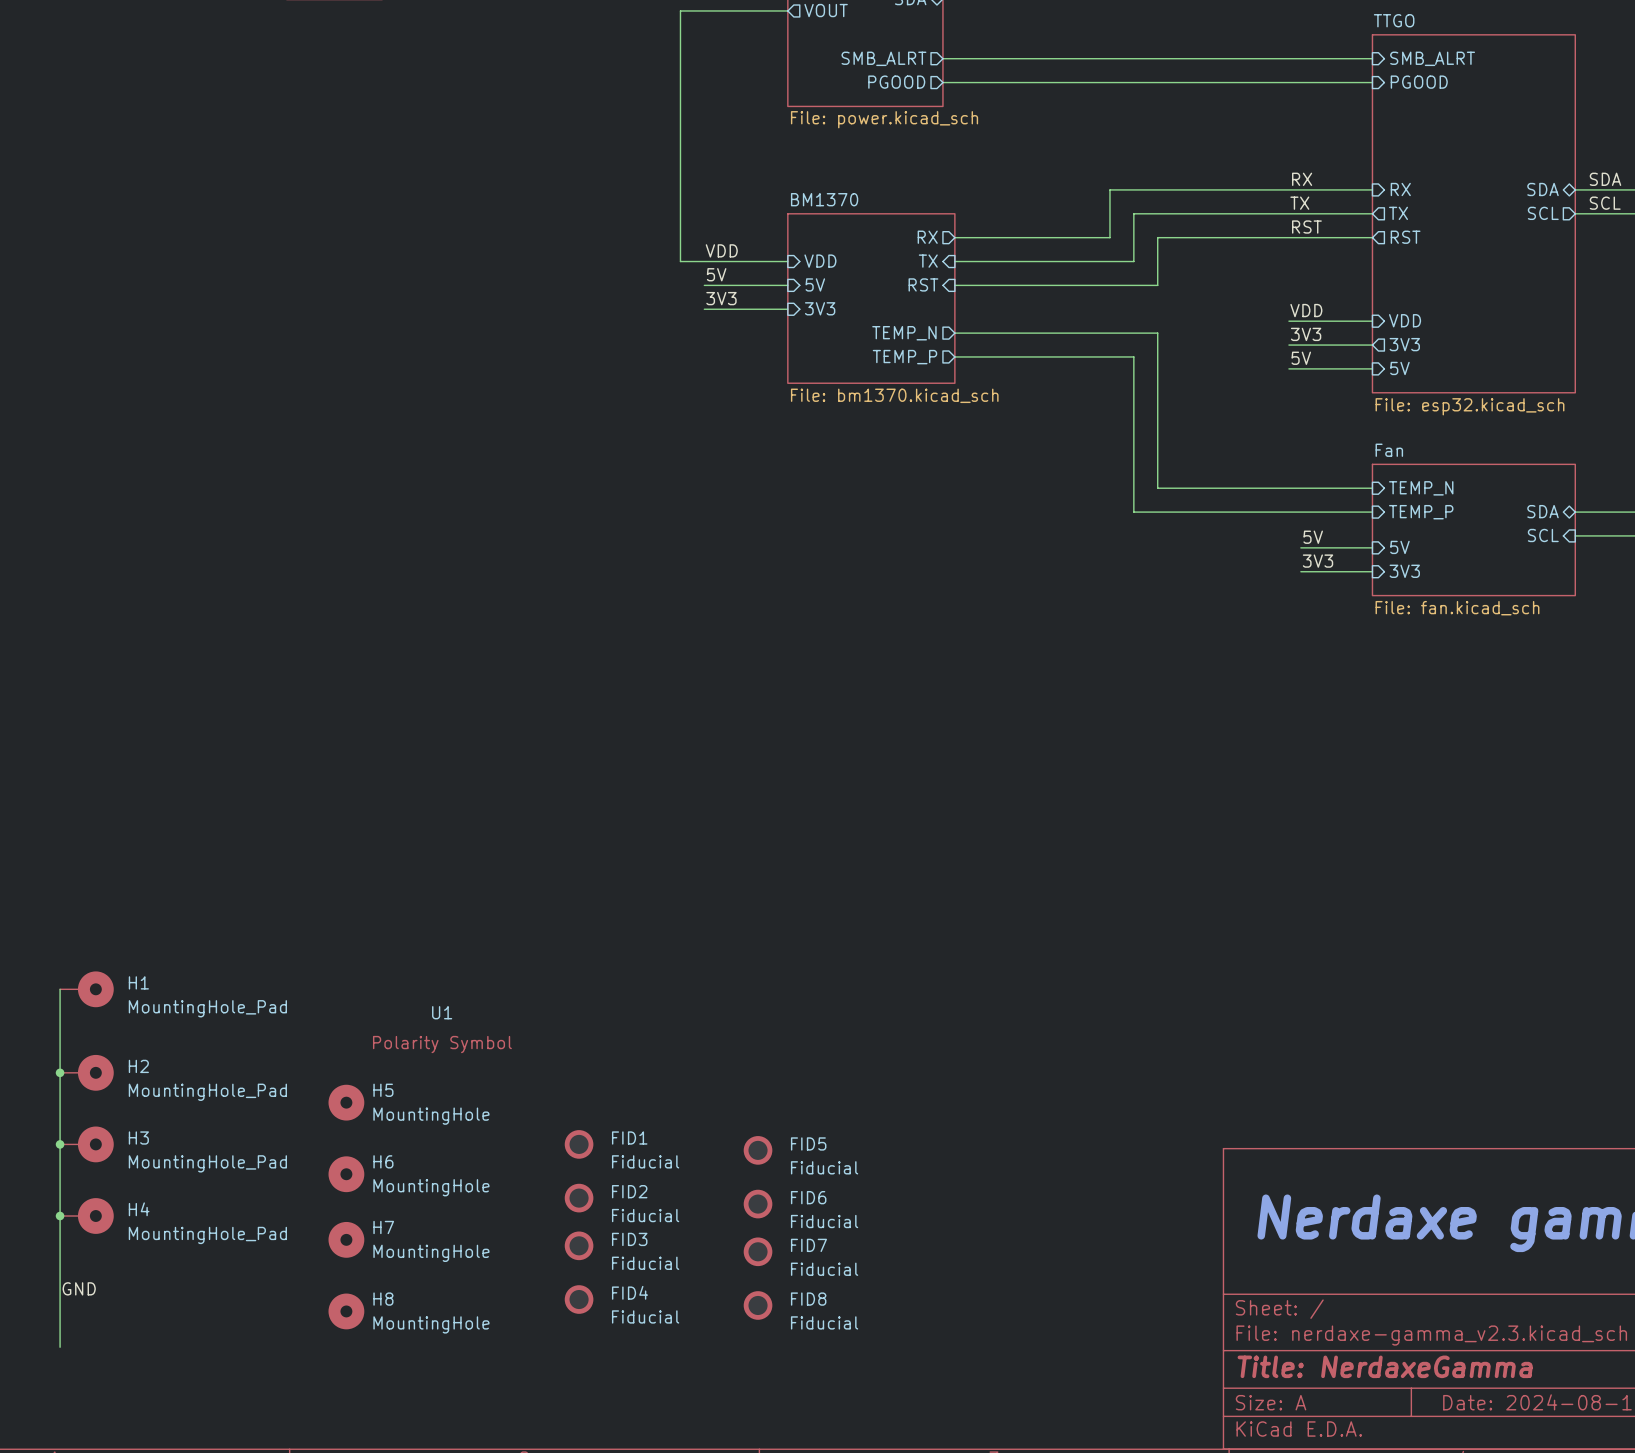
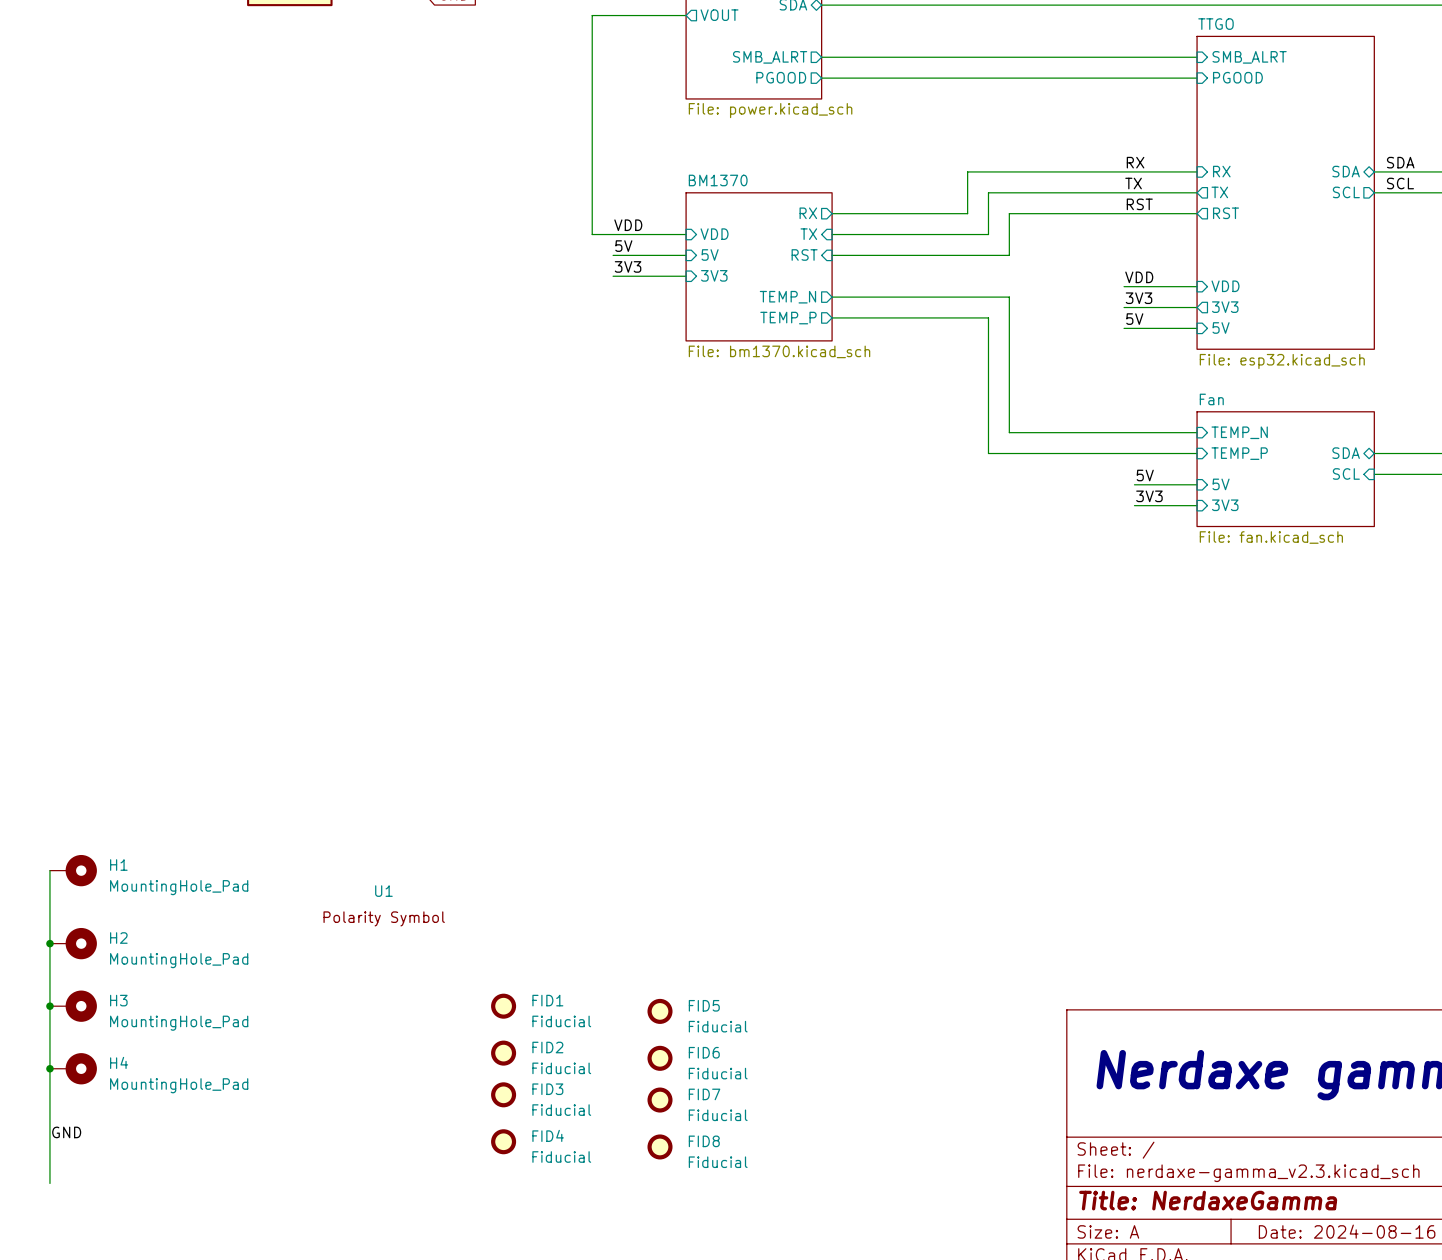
H5: MountingHole (346, 1102) -> none
H6: MountingHole (346, 1174) -> none
H7: MountingHole (346, 1239) -> none
H8: MountingHole (346, 1311) -> none

